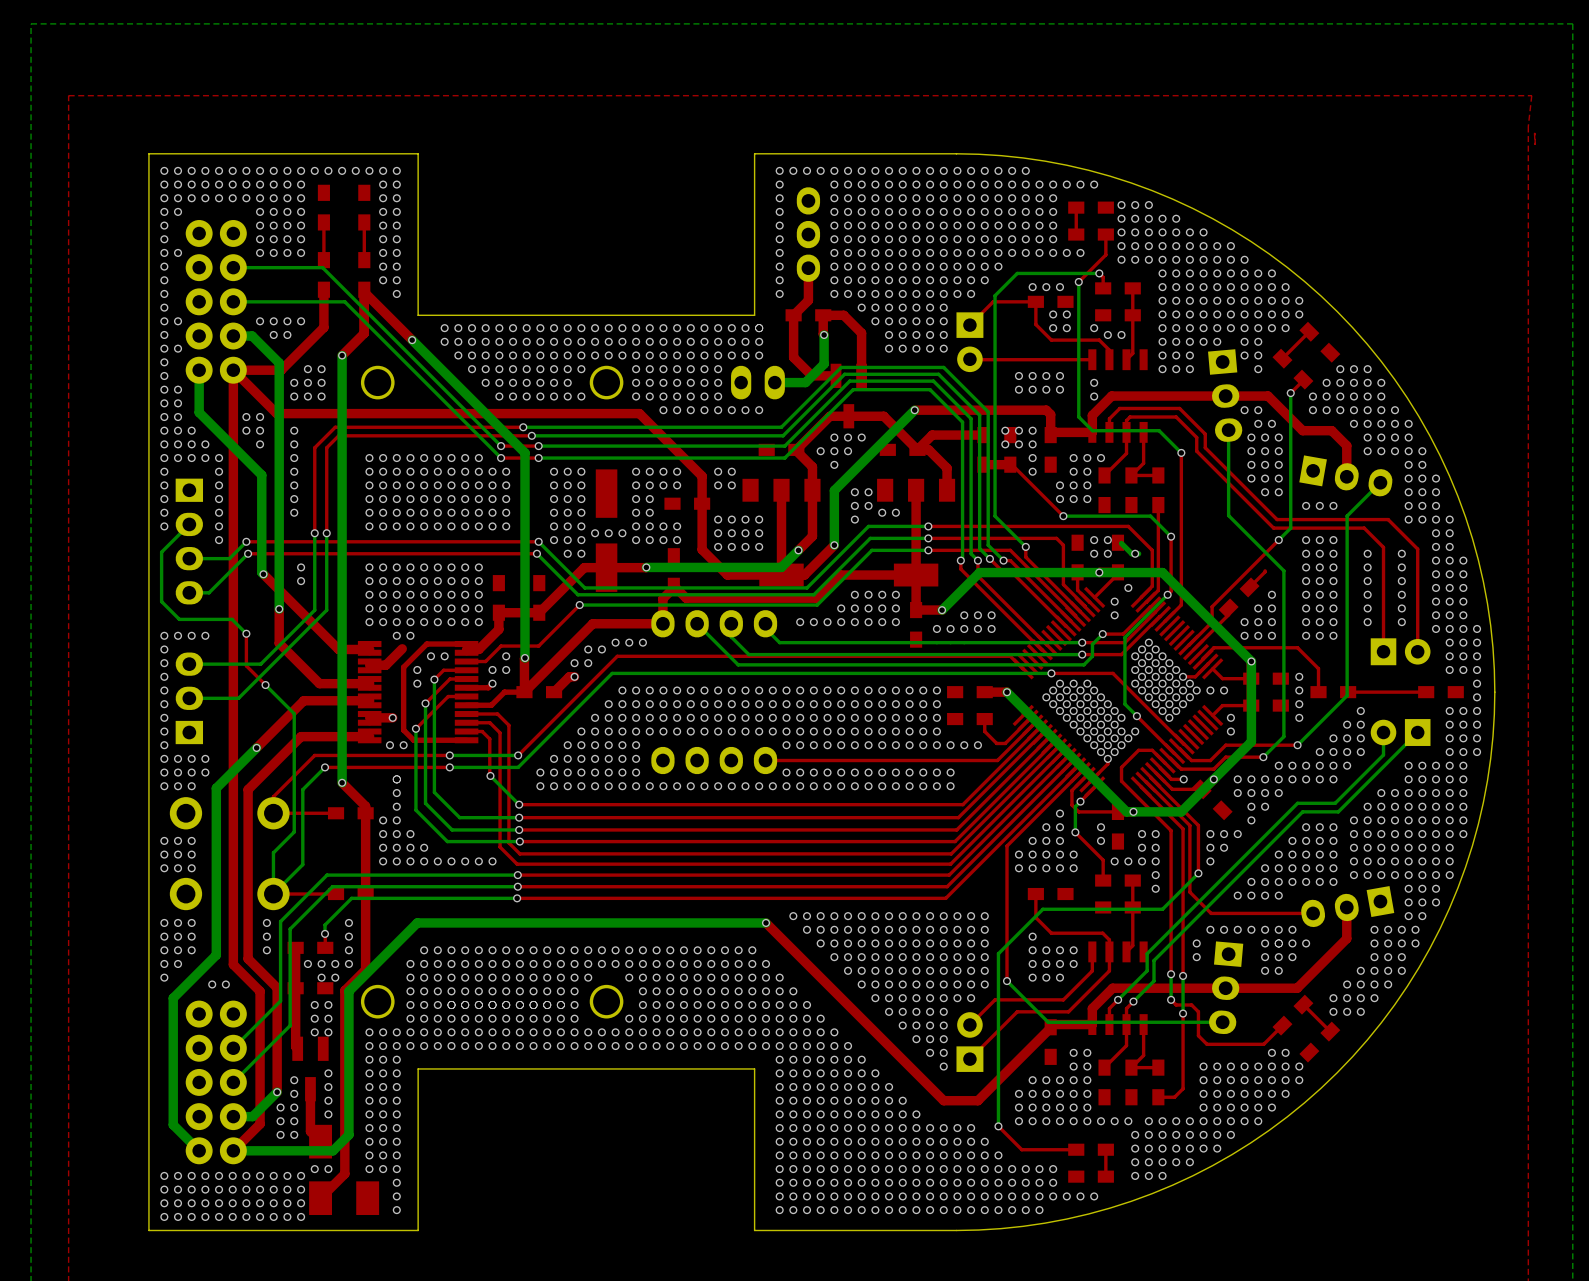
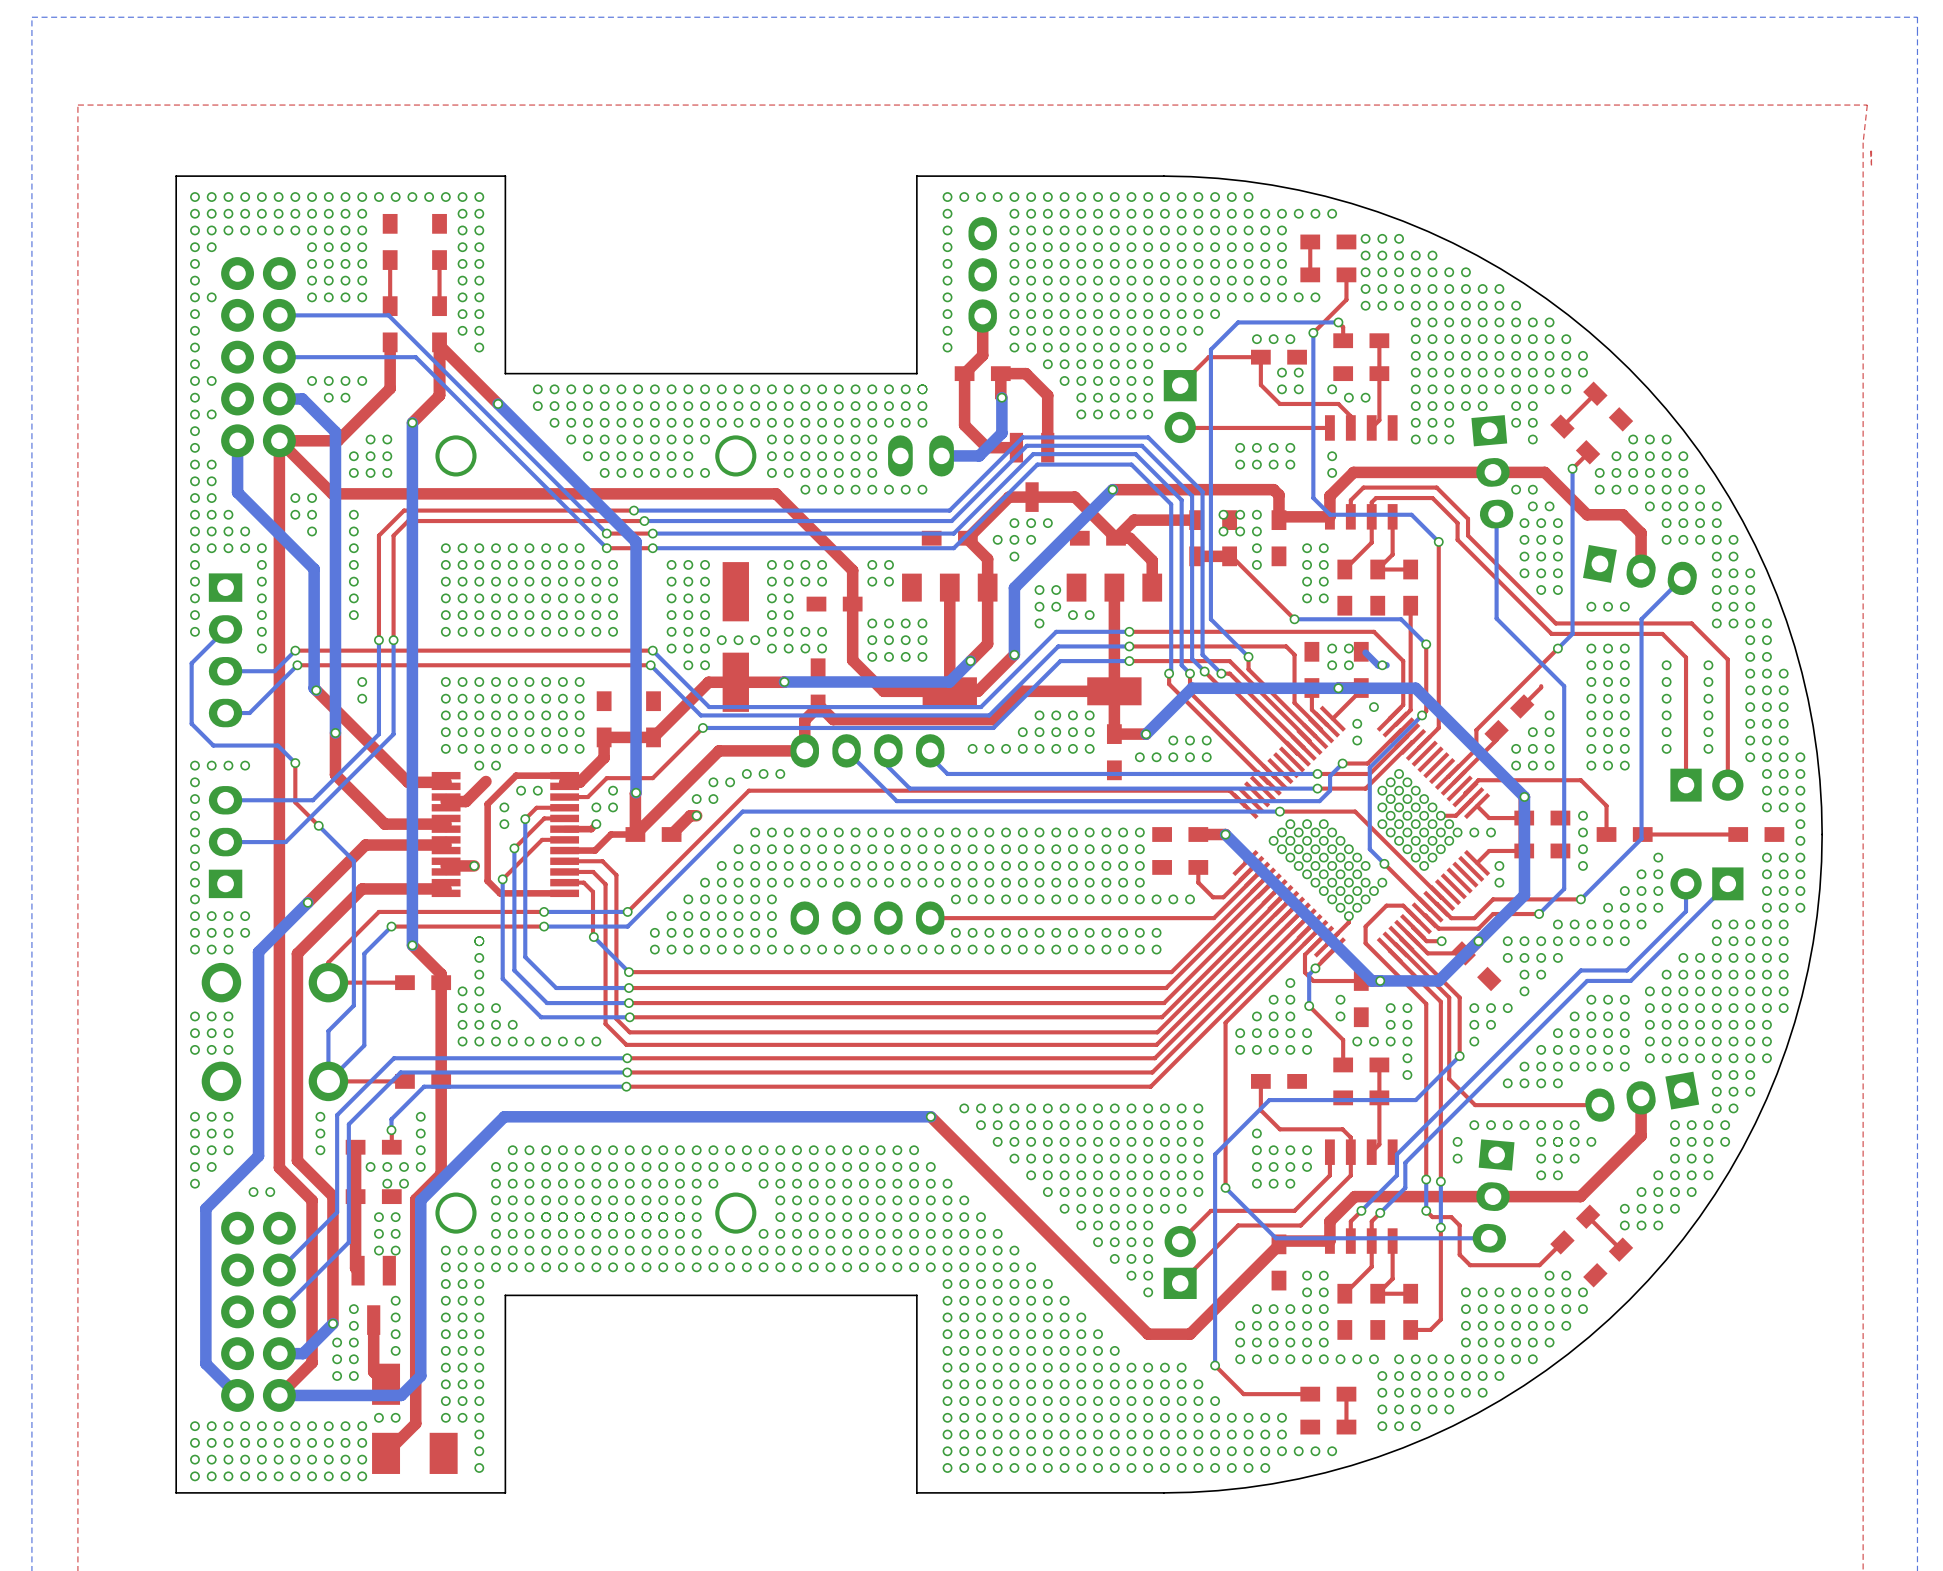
via: (1101, 458) -> none
via: (1059, 485) -> none
via: (1059, 499) -> none
via: (389, 745) -> none
via: (403, 745) -> none

